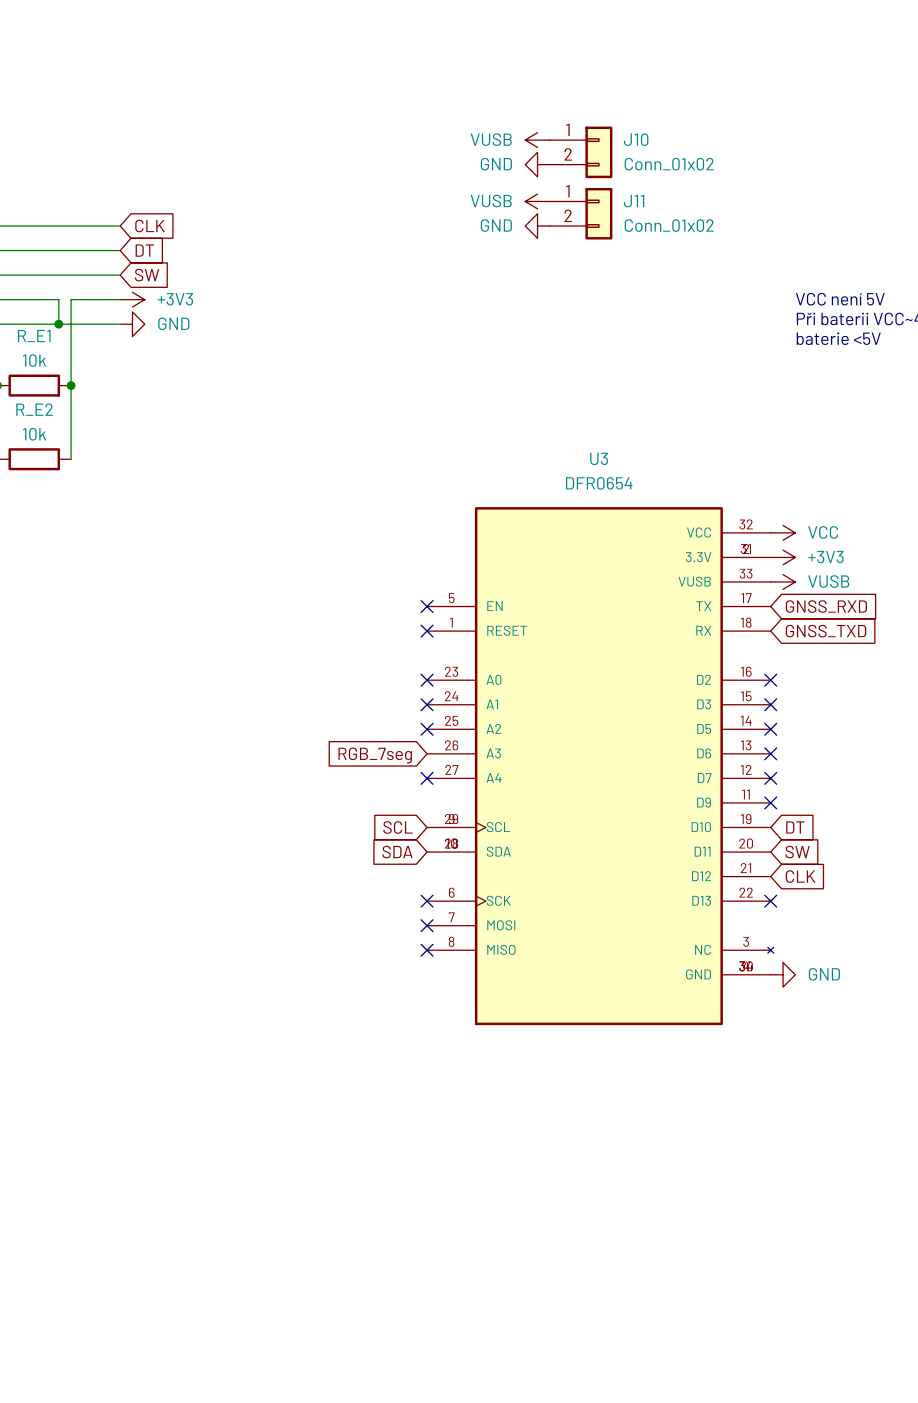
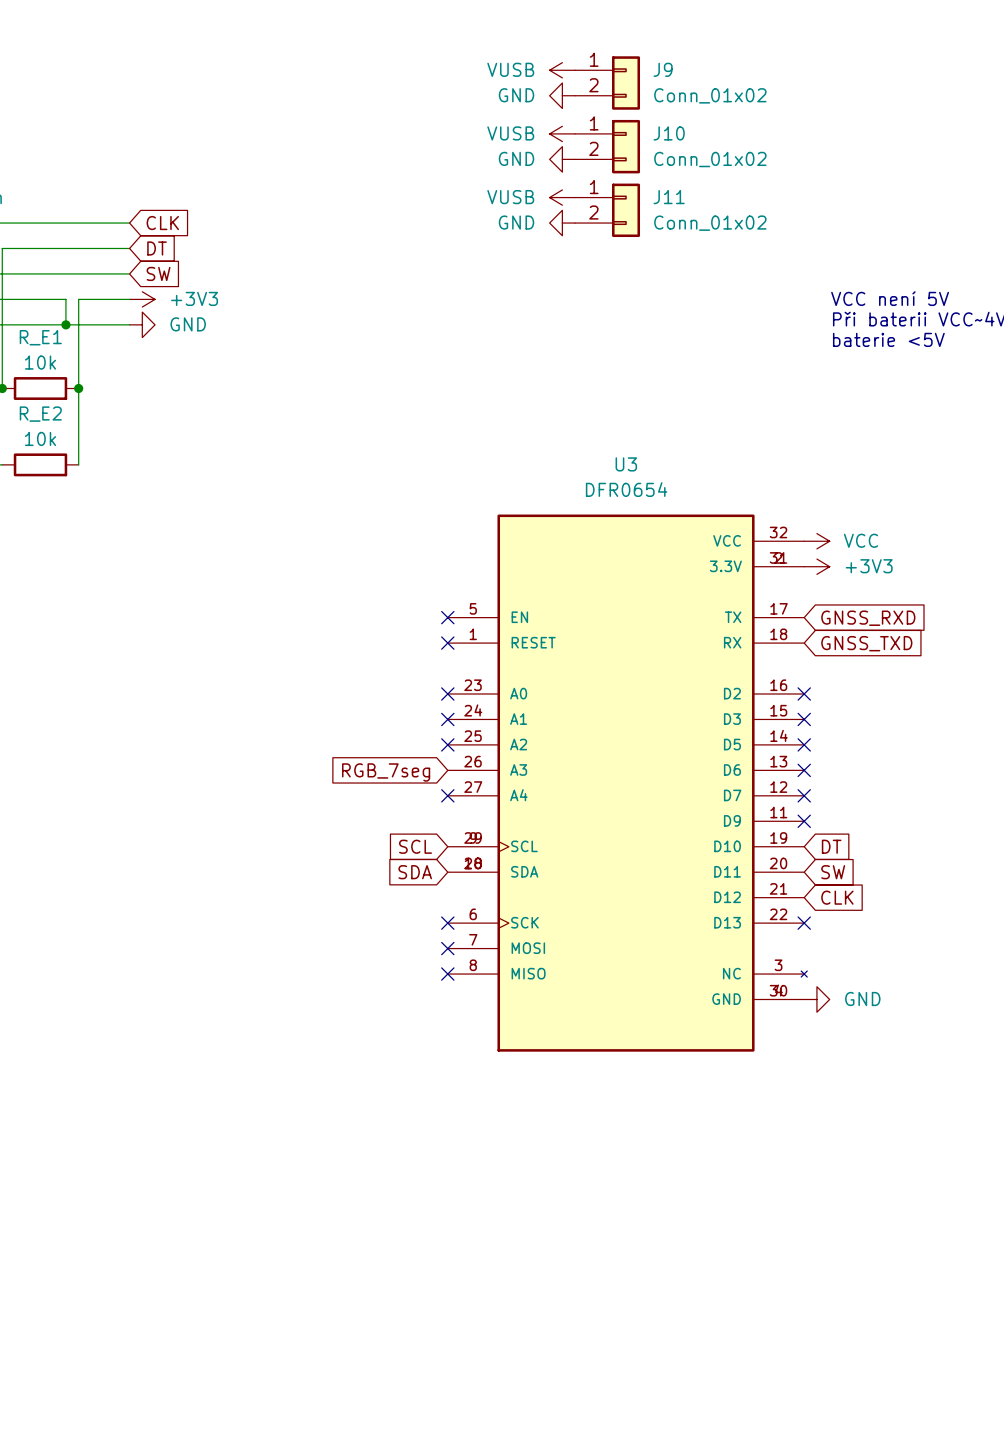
power symbol: none -> VUSB (562, 70)
J9: none -> Conn_01x02 (607, 83)
power symbol: none -> GND (562, 95)
U3 symbol: [427, 507, 774, 1026] -> [447, 514, 808, 1052]
power symbol: VUSB (783, 581) -> none

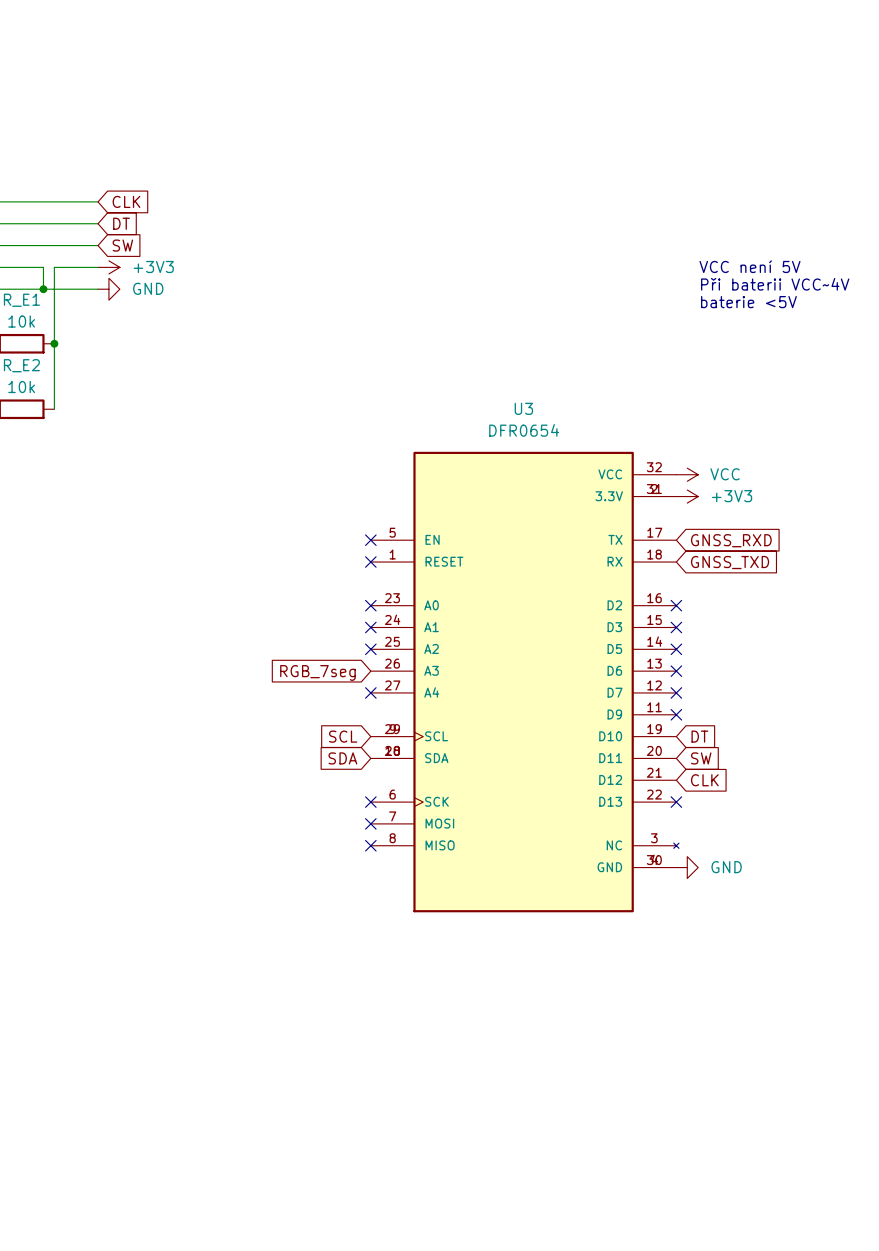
power symbol: VUSB (562, 70) -> none
J9: Conn_01x02 (607, 83) -> none
power symbol: GND (562, 95) -> none
power symbol: VUSB (562, 133) -> none
J10: Conn_01x02 (607, 146) -> none
power symbol: GND (562, 159) -> none
power symbol: VUSB (562, 197) -> none
J11: Conn_01x02 (607, 210) -> none
power symbol: GND (562, 223) -> none

